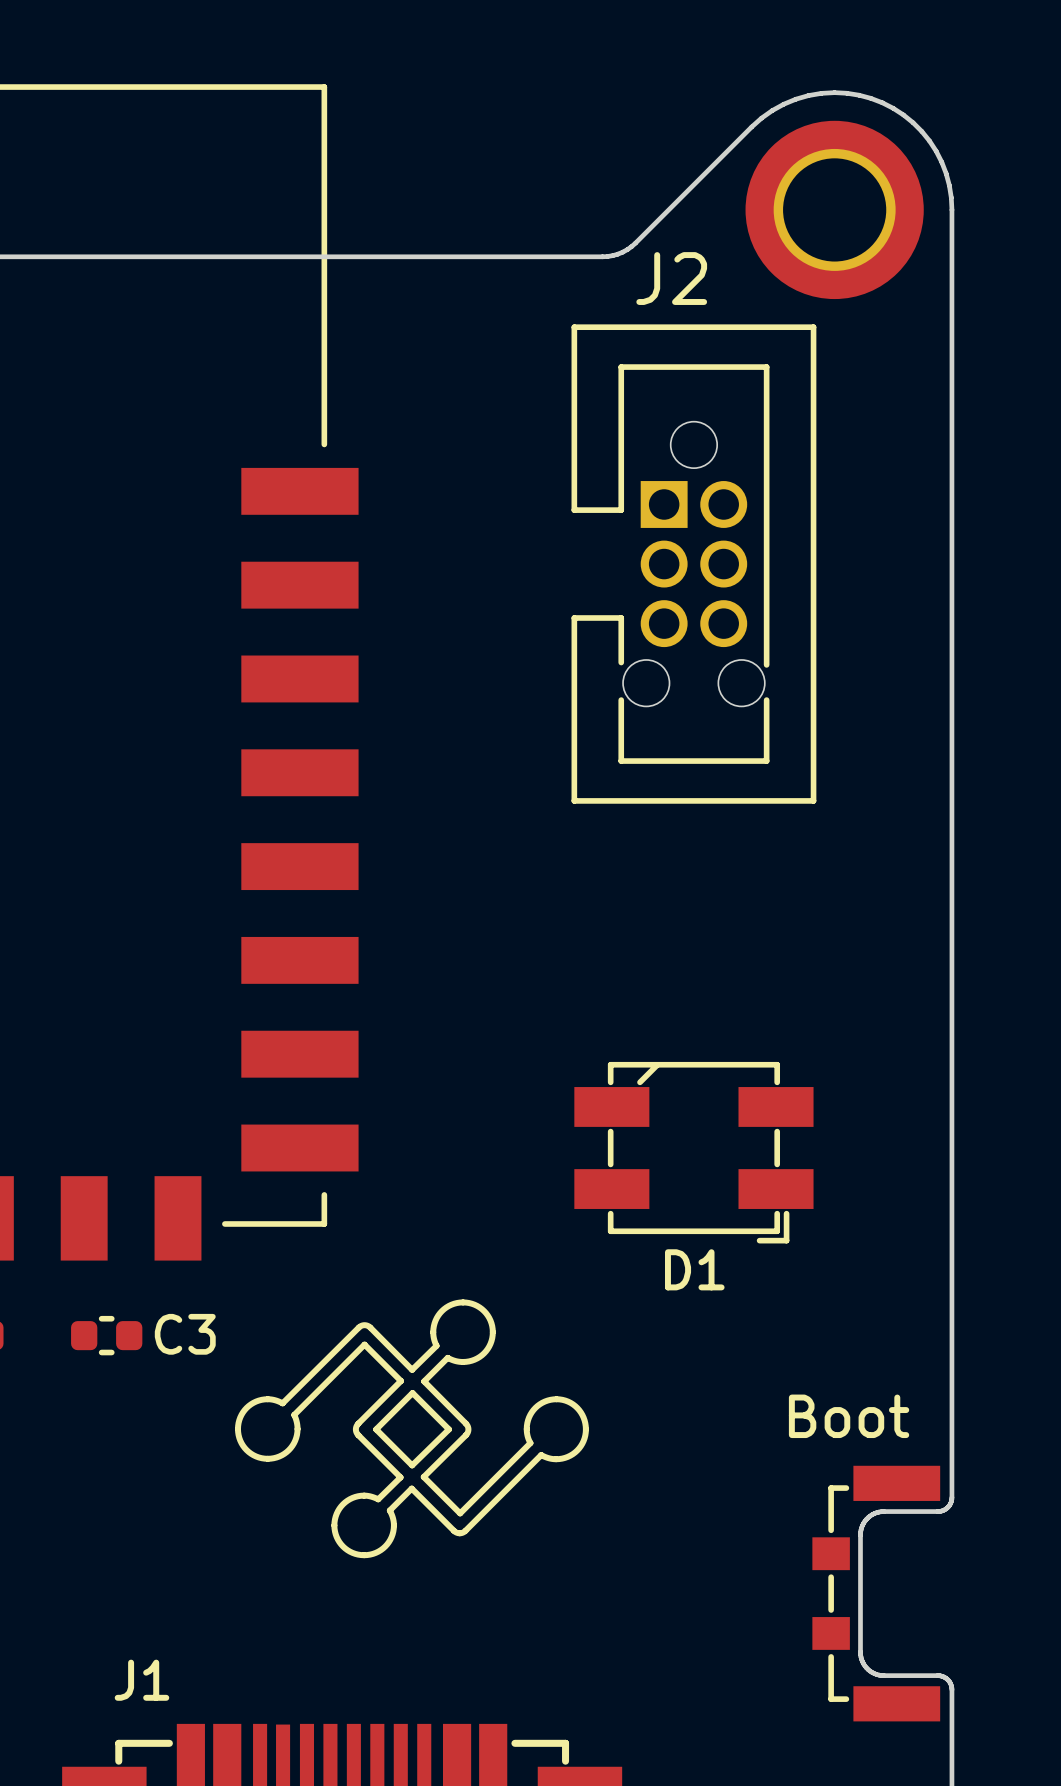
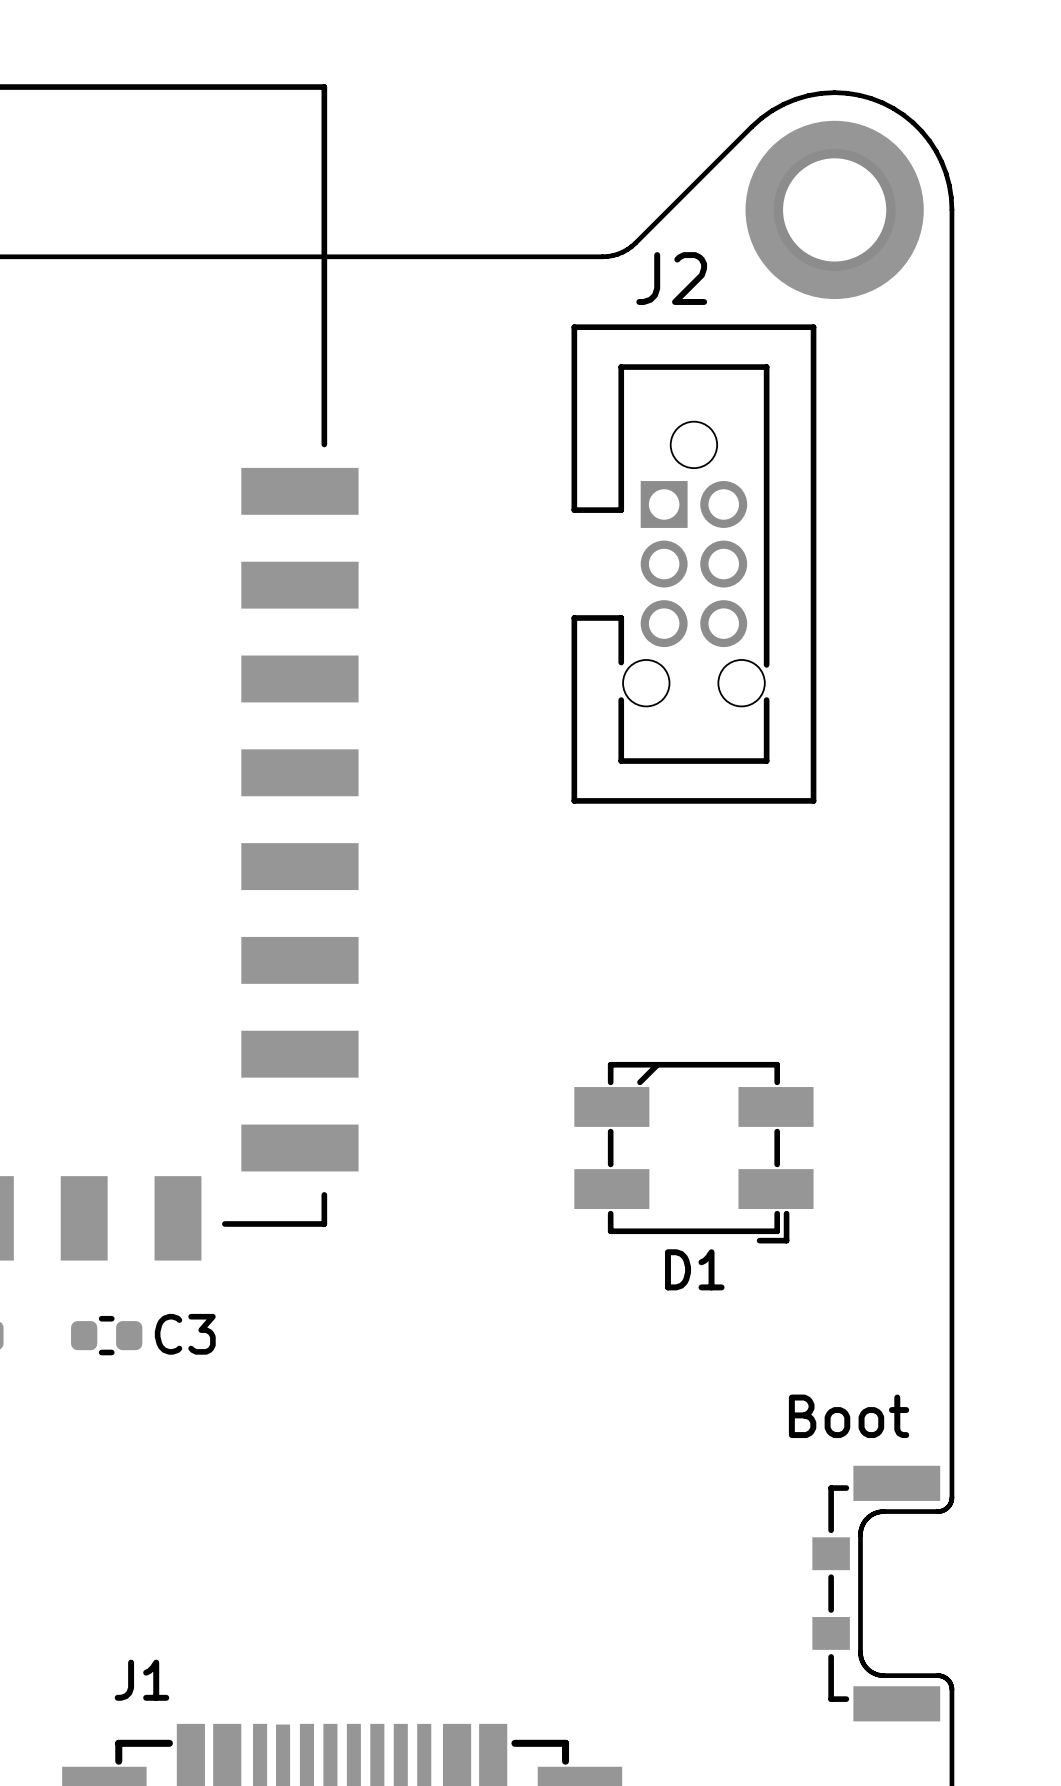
drawing: [235, 1299, 589, 1559] -> none

